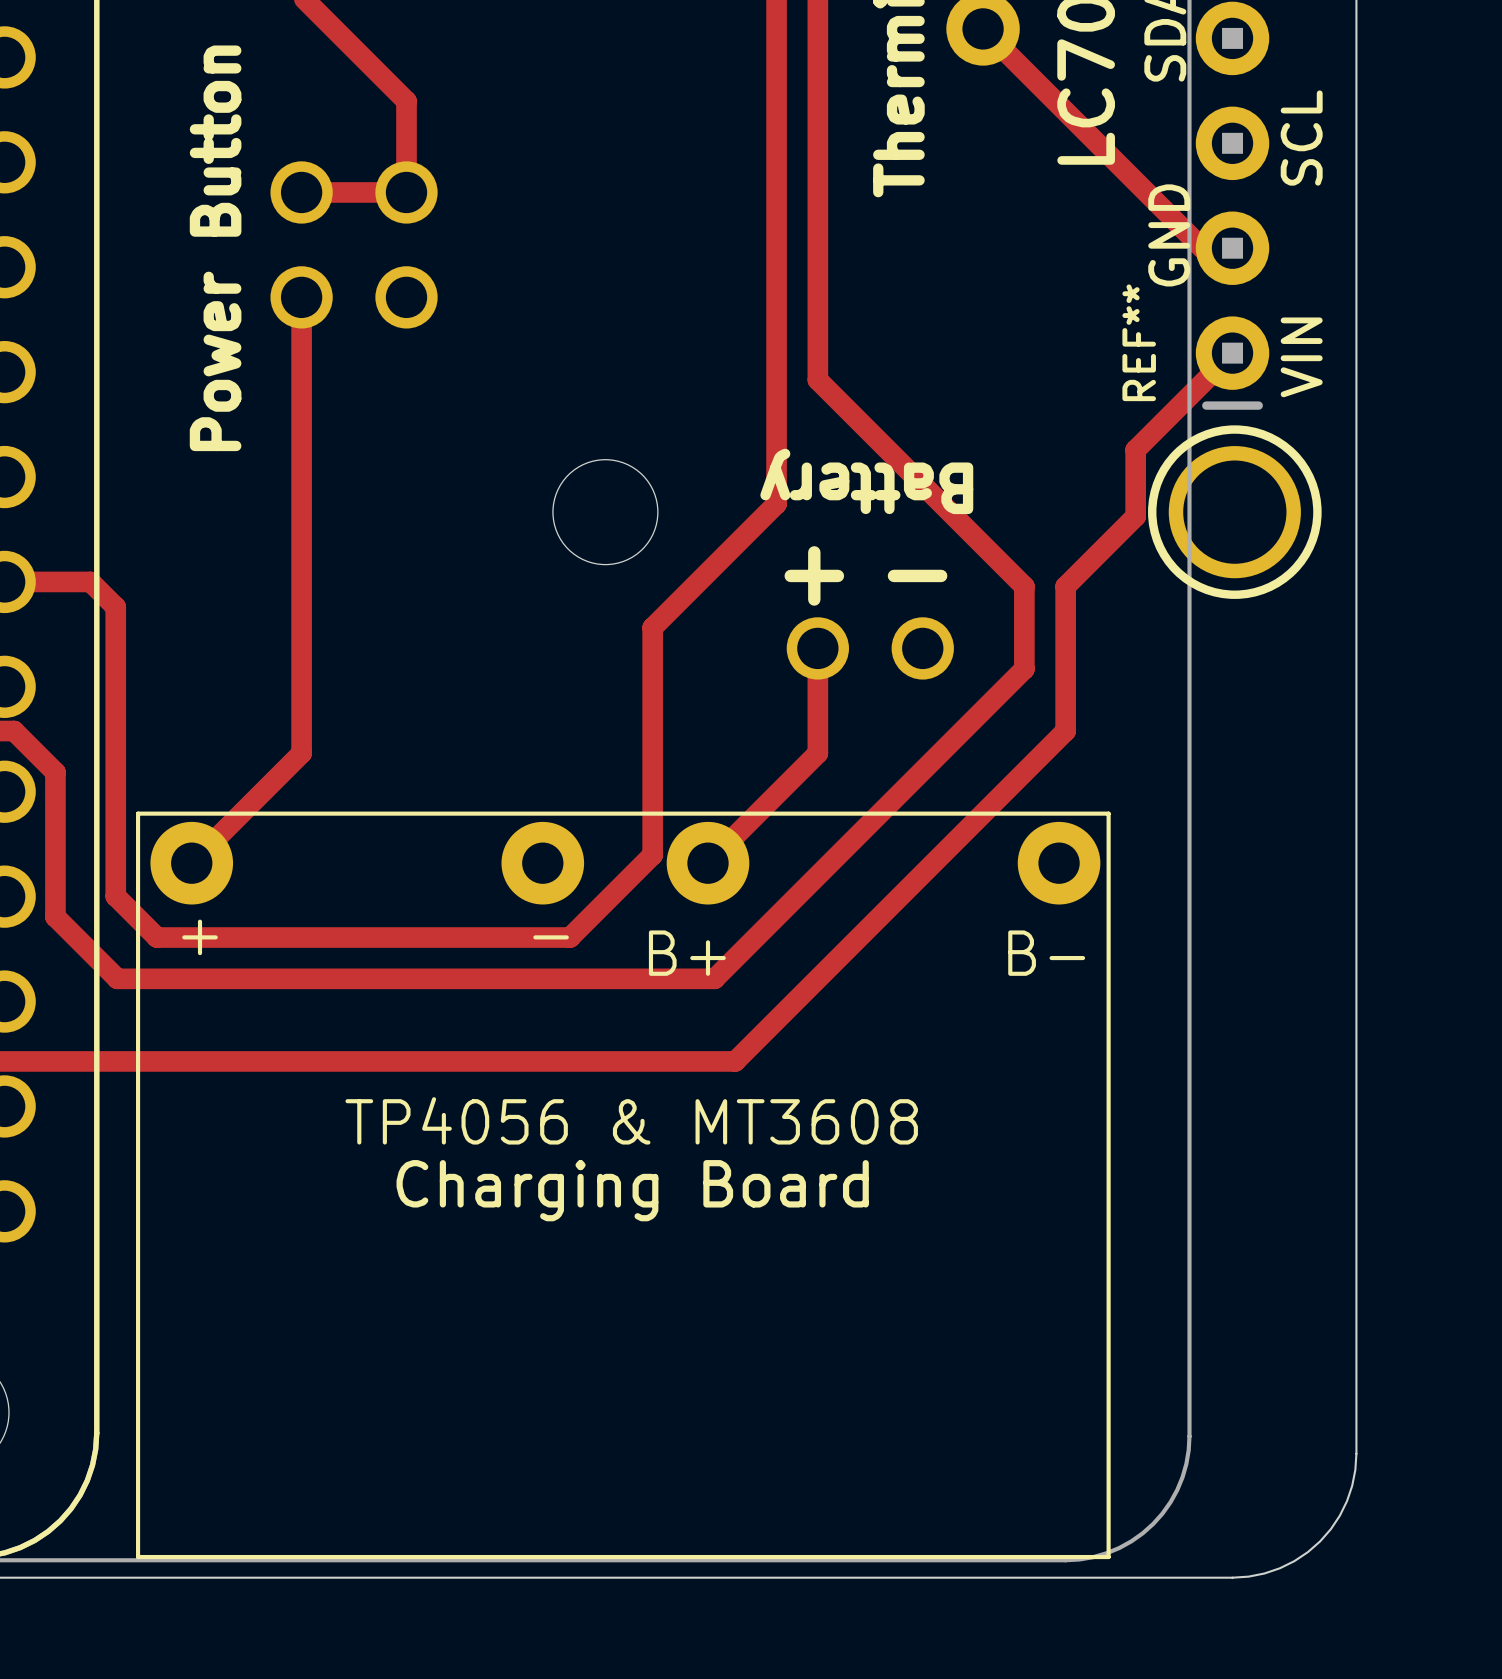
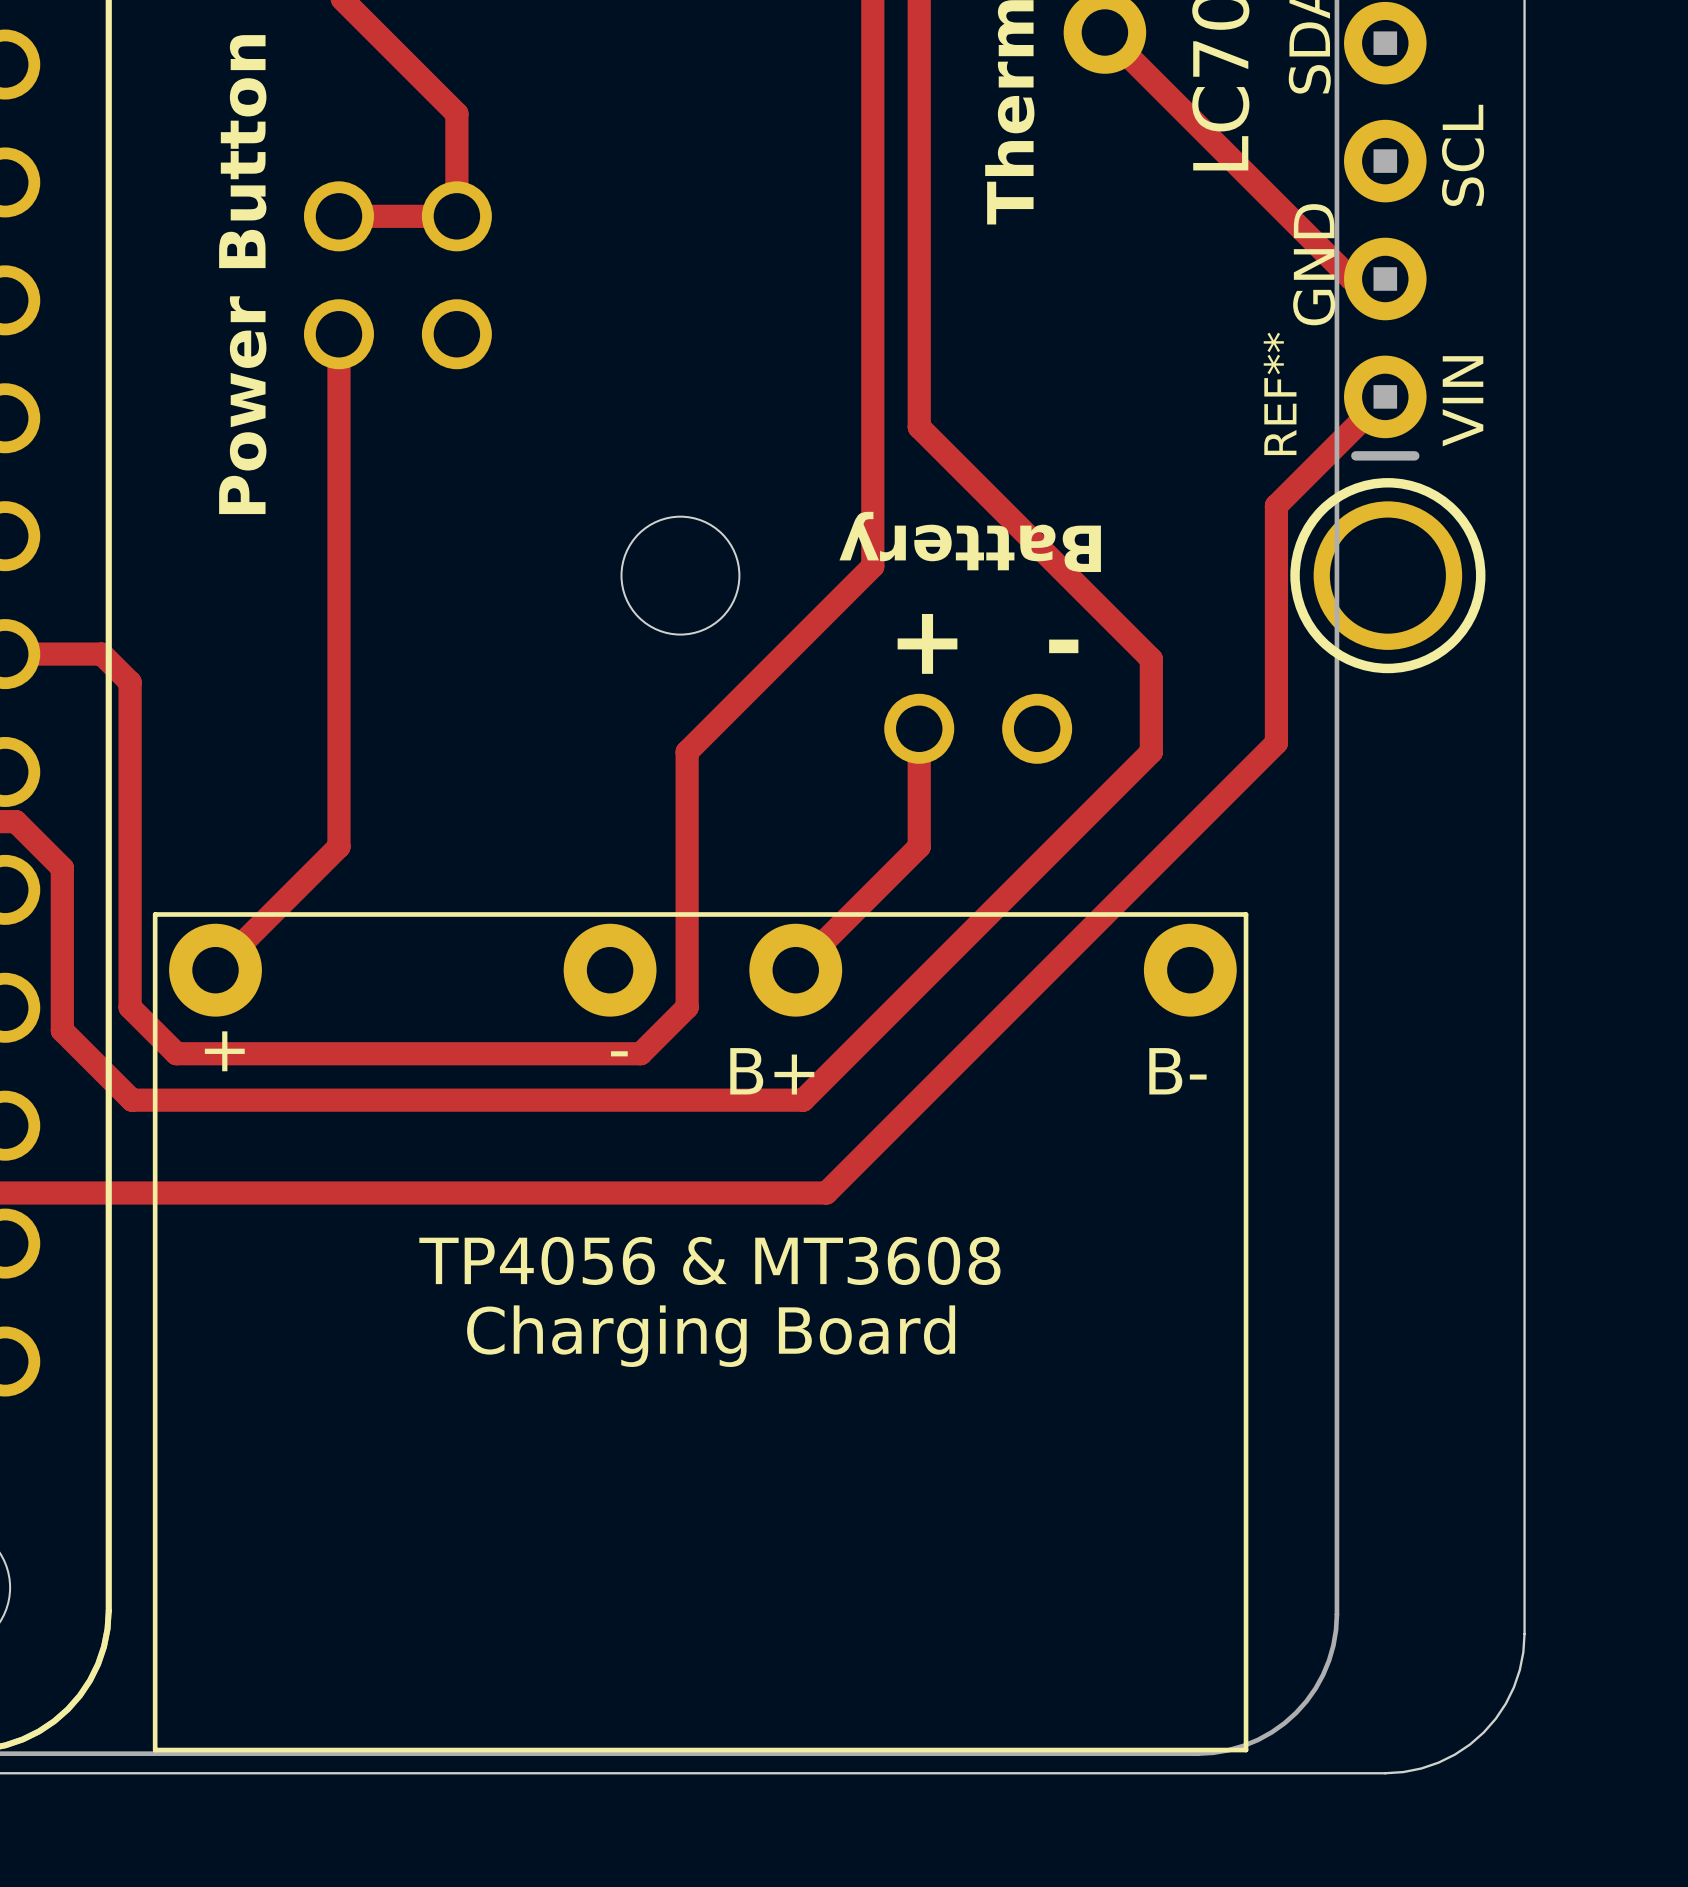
track: (1135, 516) (1065, 586) (1065, 731) -> (1276, 580) (1276, 742) (1197, 821)
track: (652, 627) (652, 854) (611, 896) -> (733, 705) (687, 752) (687, 1007)

